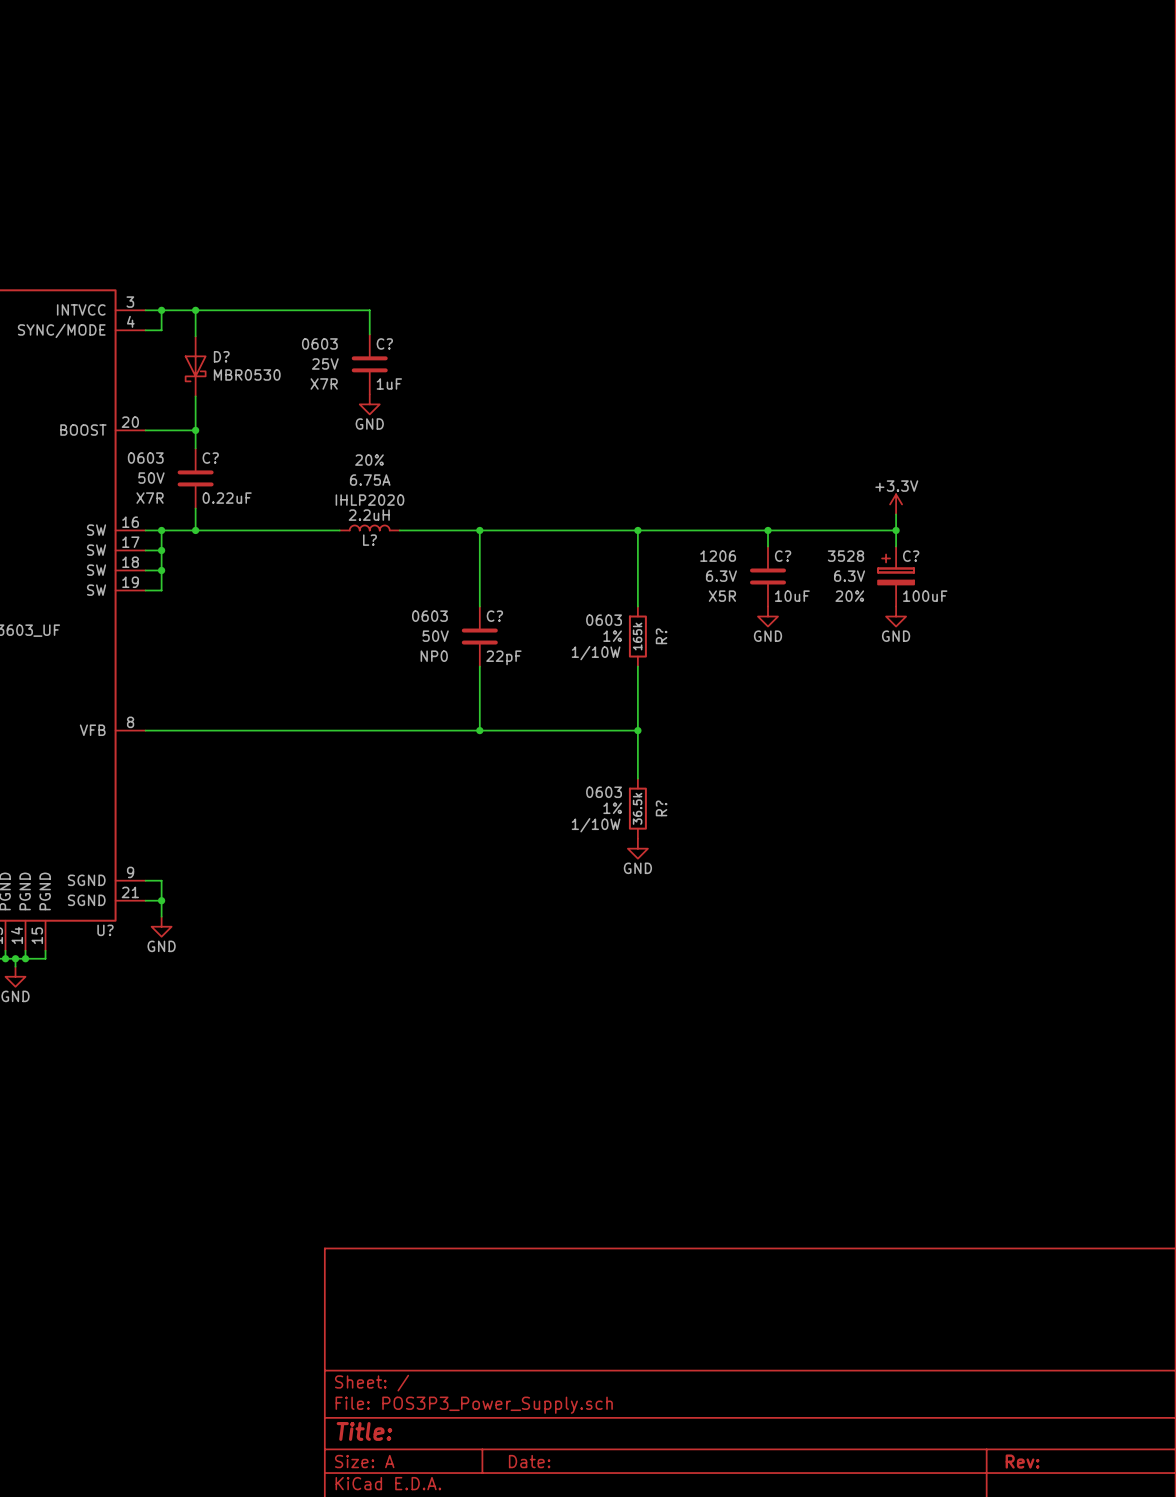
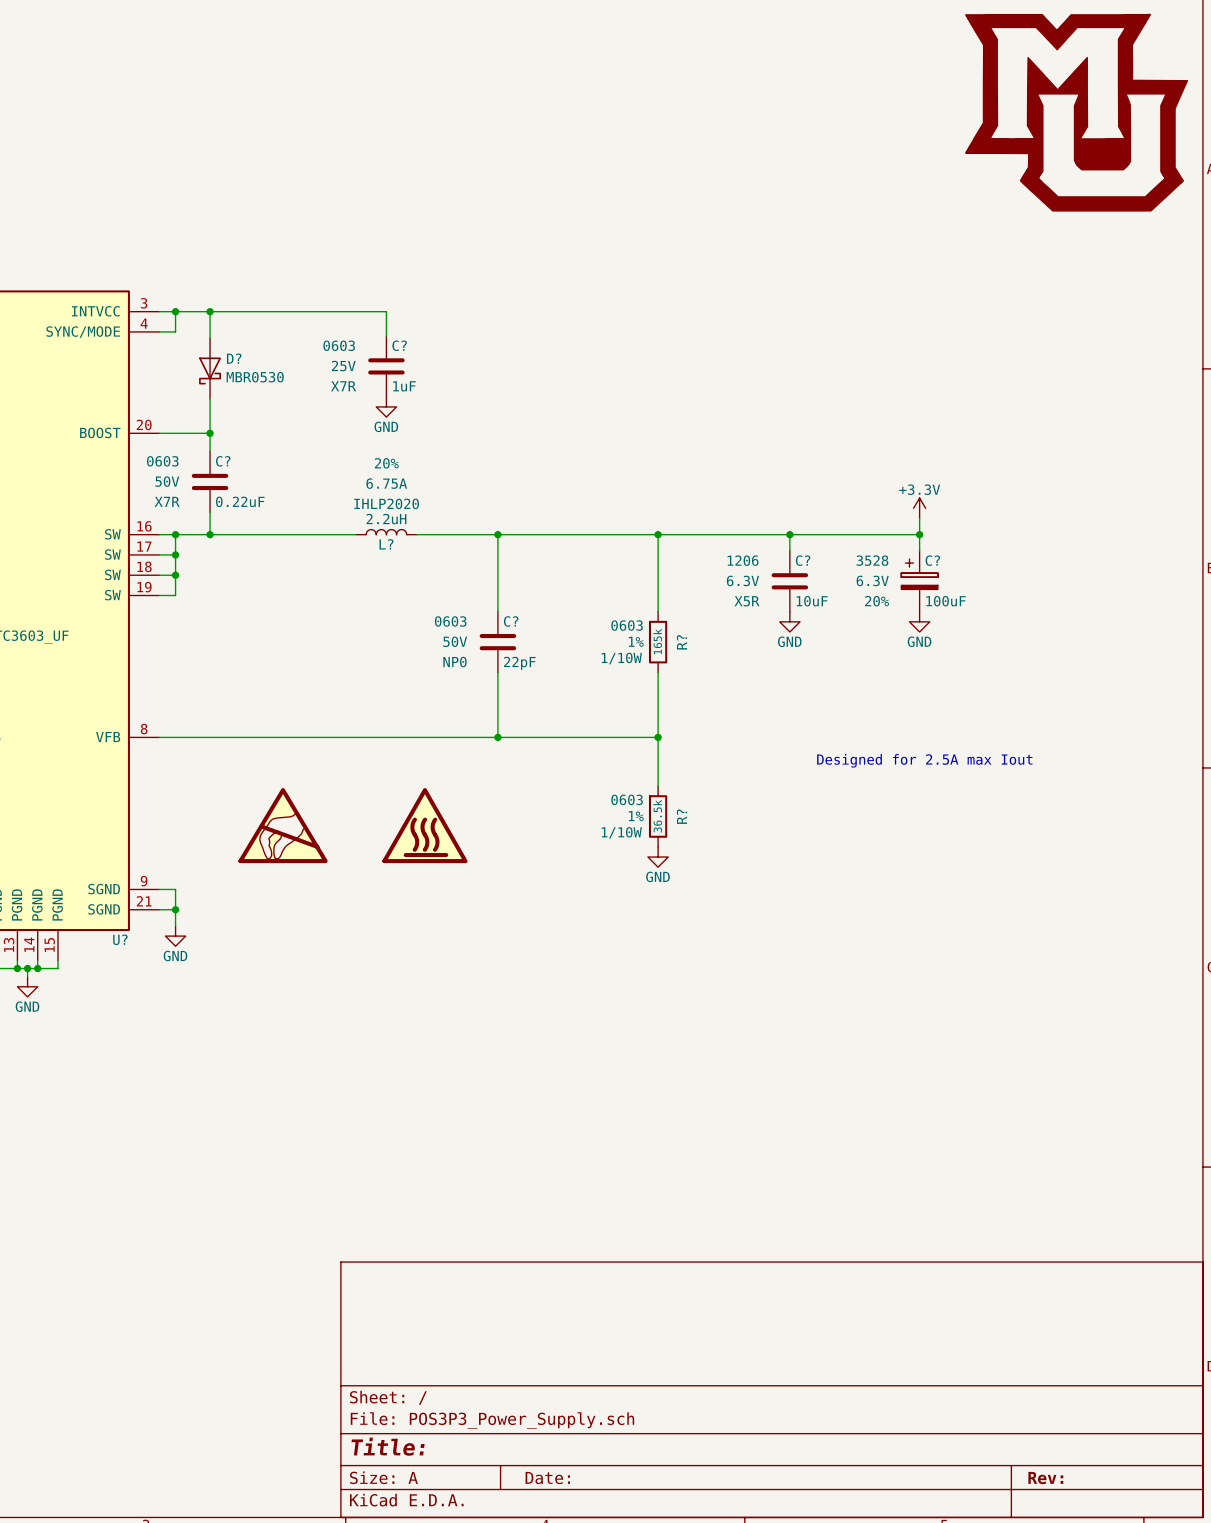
power symbol: none -> (1076, 112)
text: none -> Designed for 2.5A max Iout (924, 760)
power symbol: none -> (283, 825)
power symbol: none -> (424, 825)

